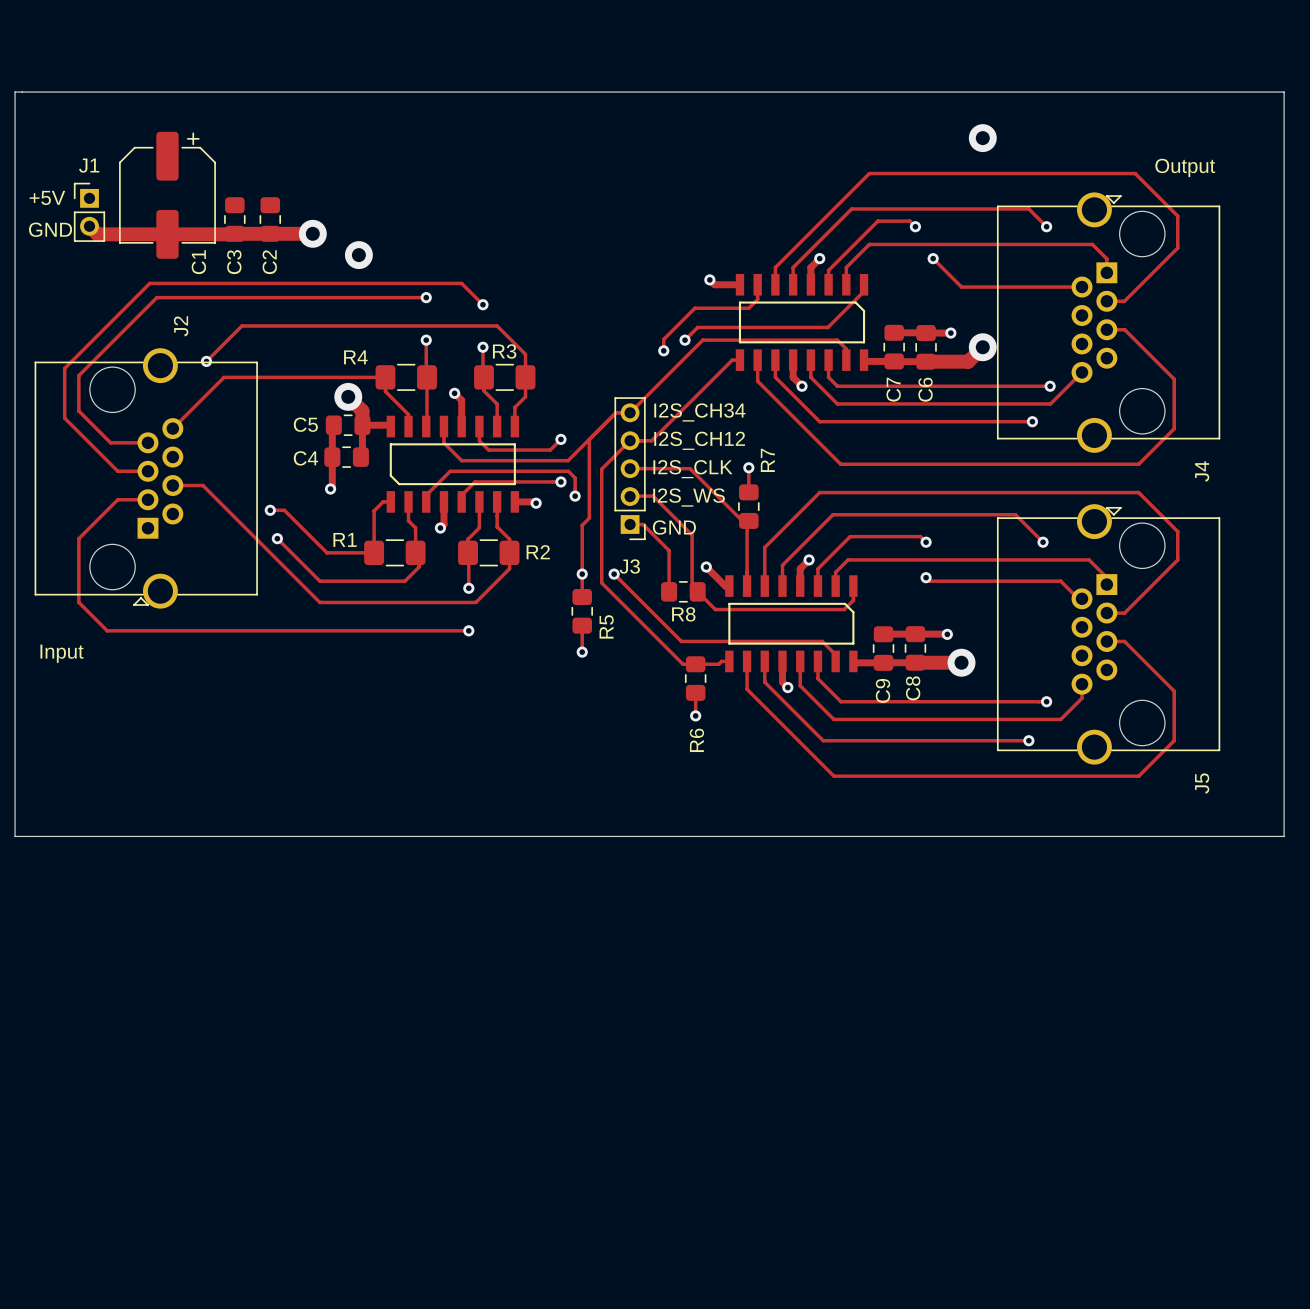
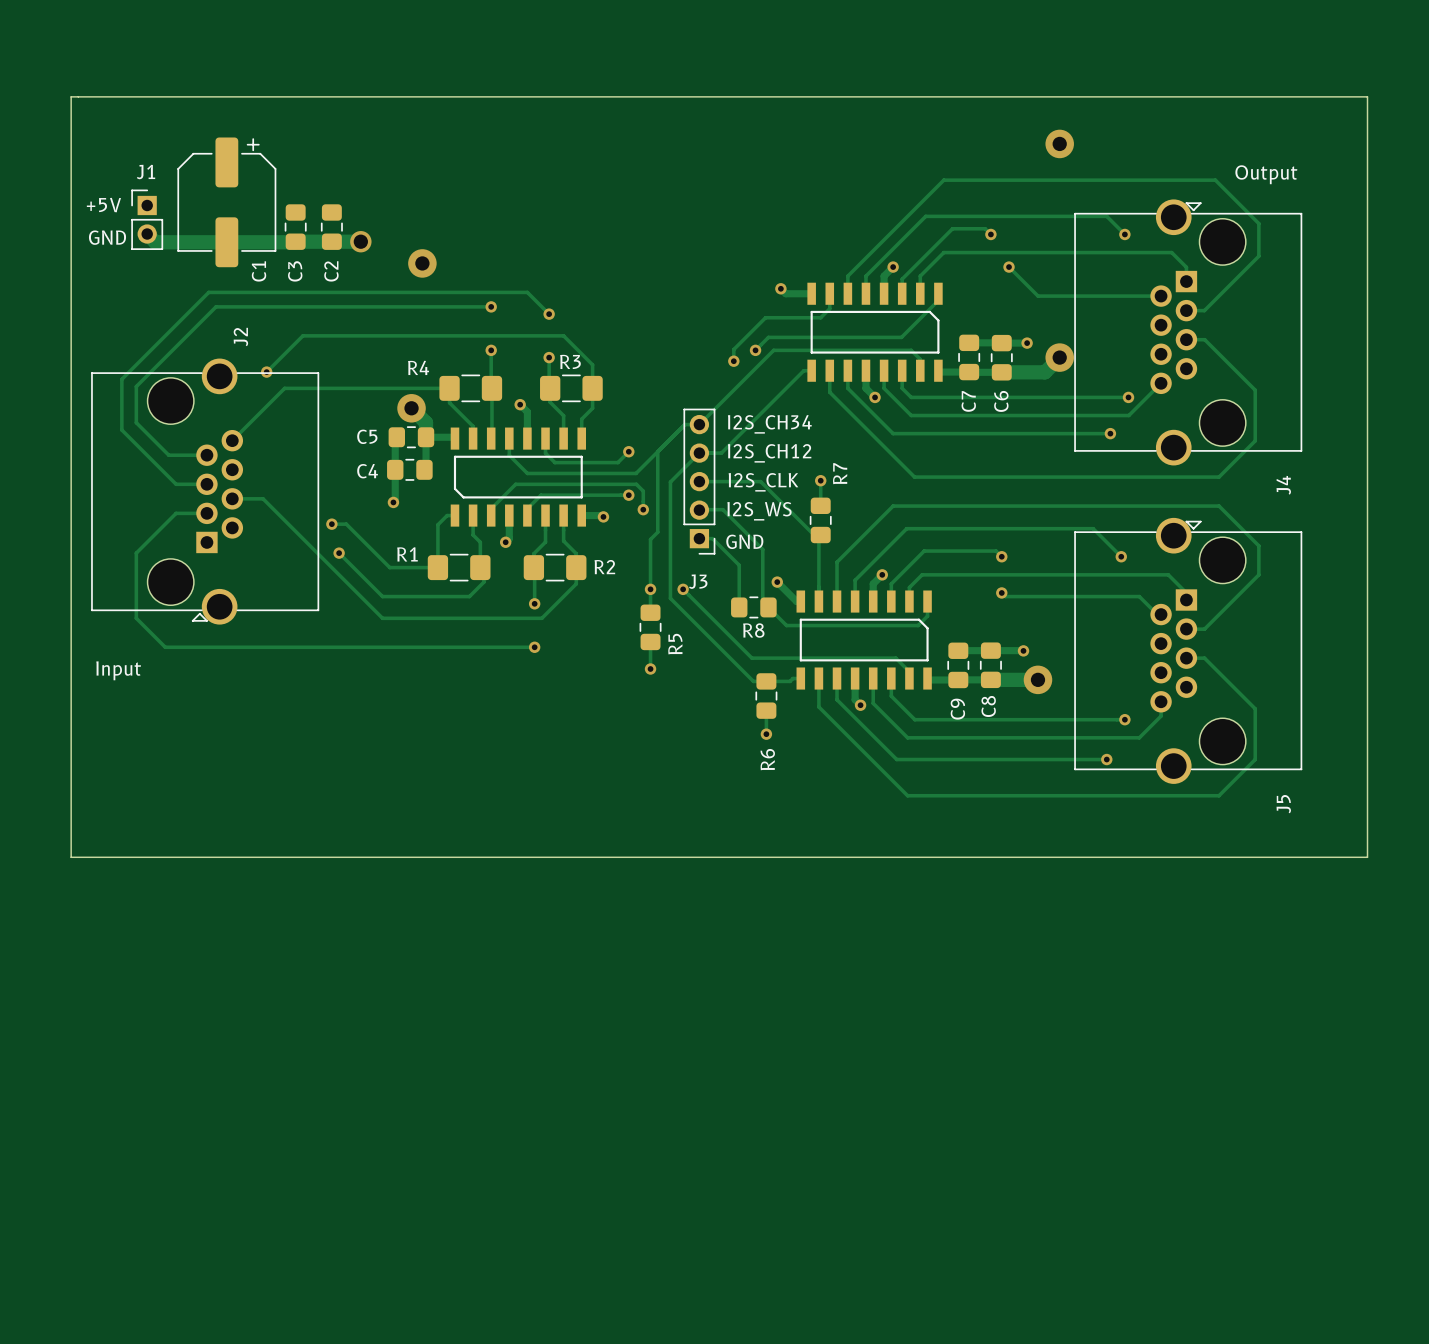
via: none -> (360, 241)
via: (312, 233) -> none

